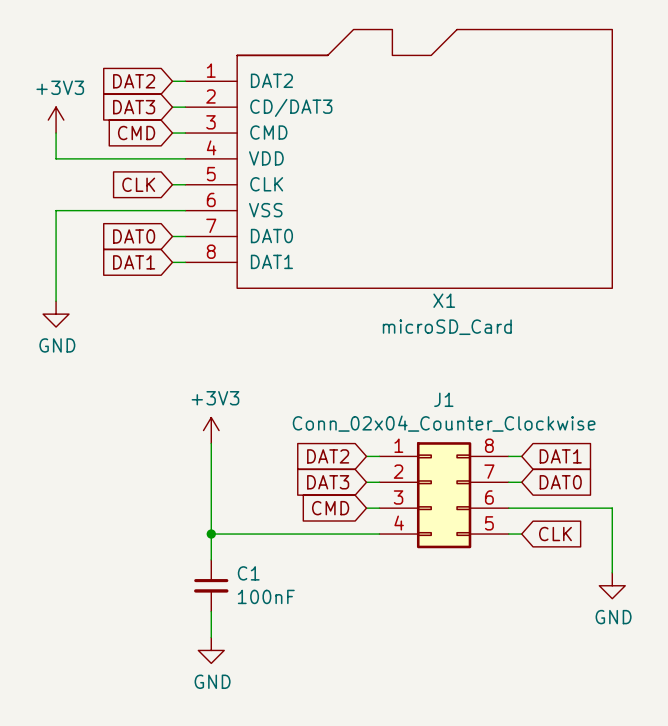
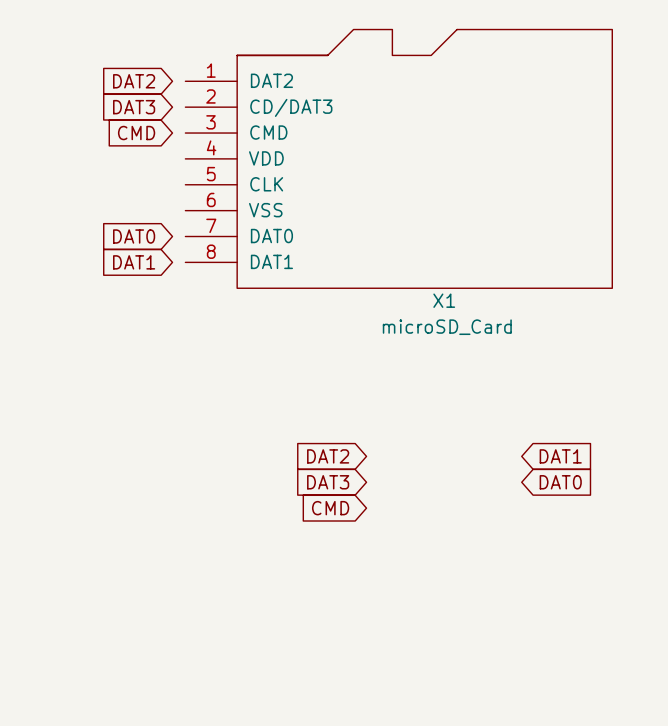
wire: (172, 81) (185, 81) -> none
wire: (172, 107) (185, 107) -> none
power symbol: +3V3 (56, 120) -> none
wire: (56, 133) (56, 158) (185, 158) -> none
wire: (172, 133) (185, 133) -> none
global label: CLK (138, 184) -> none
wire: (172, 184) (185, 184) -> none
wire: (185, 210) (56, 210) (56, 301) -> none
wire: (172, 236) (185, 236) -> none
wire: (172, 262) (185, 262) -> none
power symbol: GND (56, 314) -> none
power symbol: +3V3 (211, 430) -> none
wire: (211, 443) (211, 559) -> none
wire: (366, 456) (379, 456) -> none
wire: (508, 456) (521, 456) -> none
wire: (366, 482) (379, 482) -> none
wire: (508, 482) (521, 482) -> none
J1: Conn_02x04_Counter_Clockwise (444, 495) -> none
wire: (366, 508) (379, 508) -> none
wire: (508, 508) (612, 508) (612, 572) -> none
wire: (211, 534) (379, 534) -> none
junction: (211, 534) -> none
wire: (508, 534) (521, 534) -> none
global label: CLK (555, 534) -> none
C1: 100nF (211, 585) -> none
power symbol: GND (612, 585) -> none
wire: (211, 611) (211, 637) -> none
power symbol: GND (211, 650) -> none

